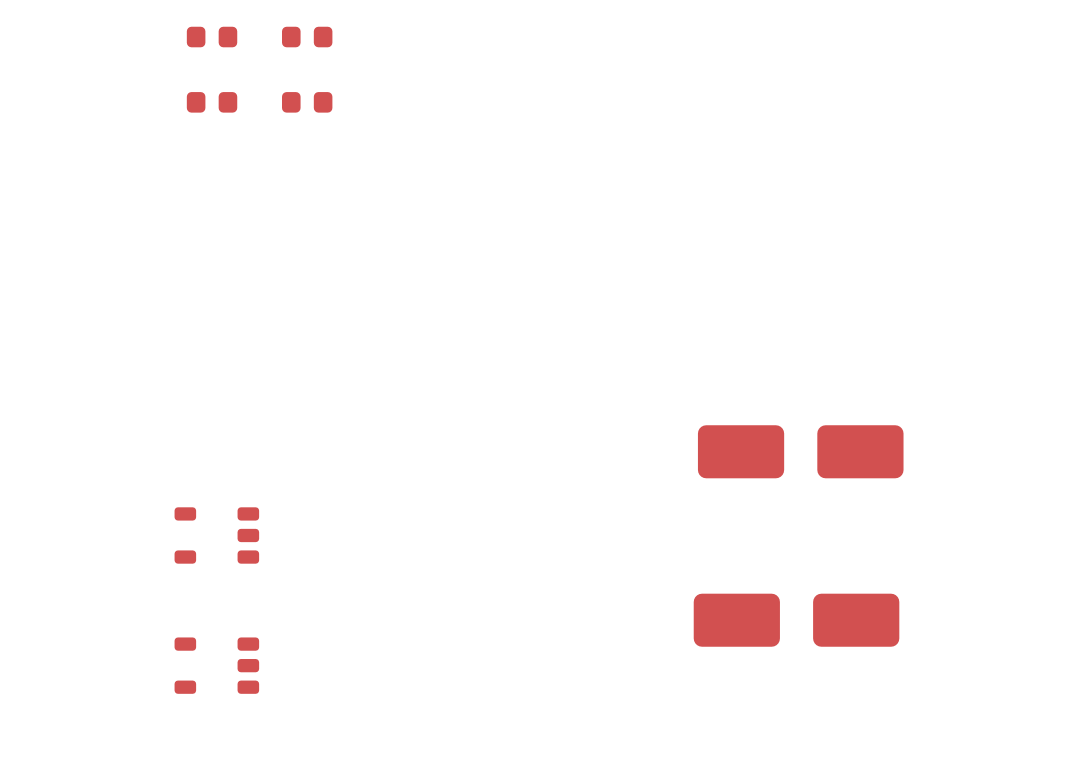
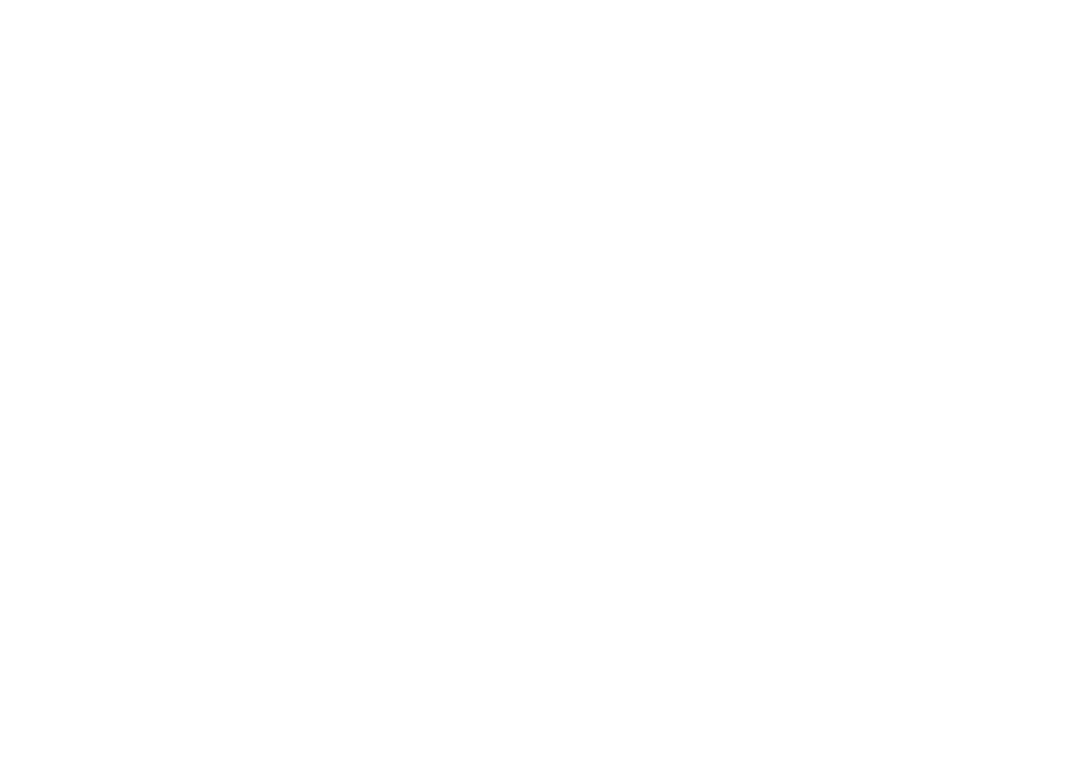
part: (212, 37) -> none
part: (307, 37) -> none
part: (212, 102) -> none
part: (307, 102) -> none
part: (800, 451) -> none
part: (216, 535) -> none
part: (796, 620) -> none
part: (216, 665) -> none

